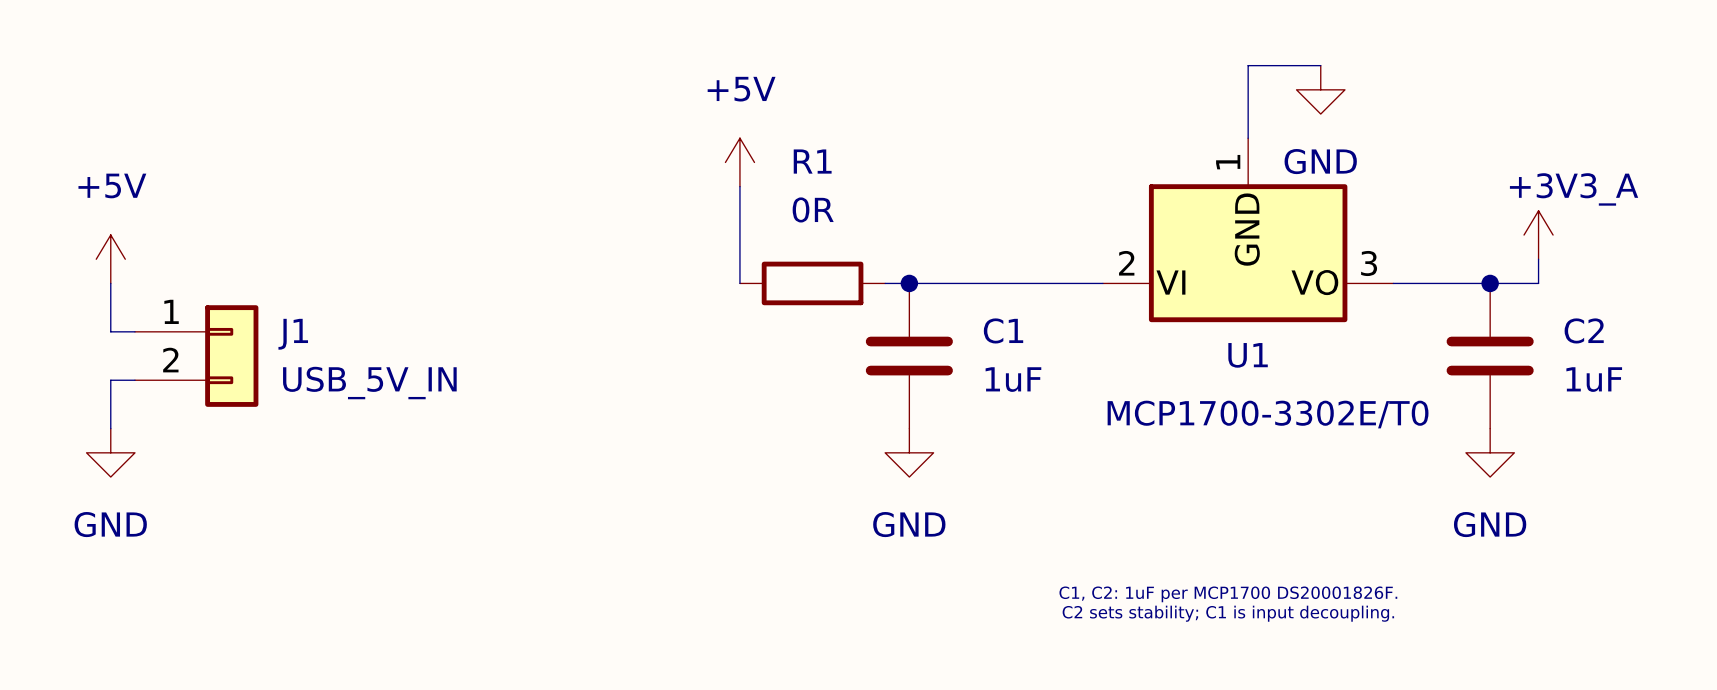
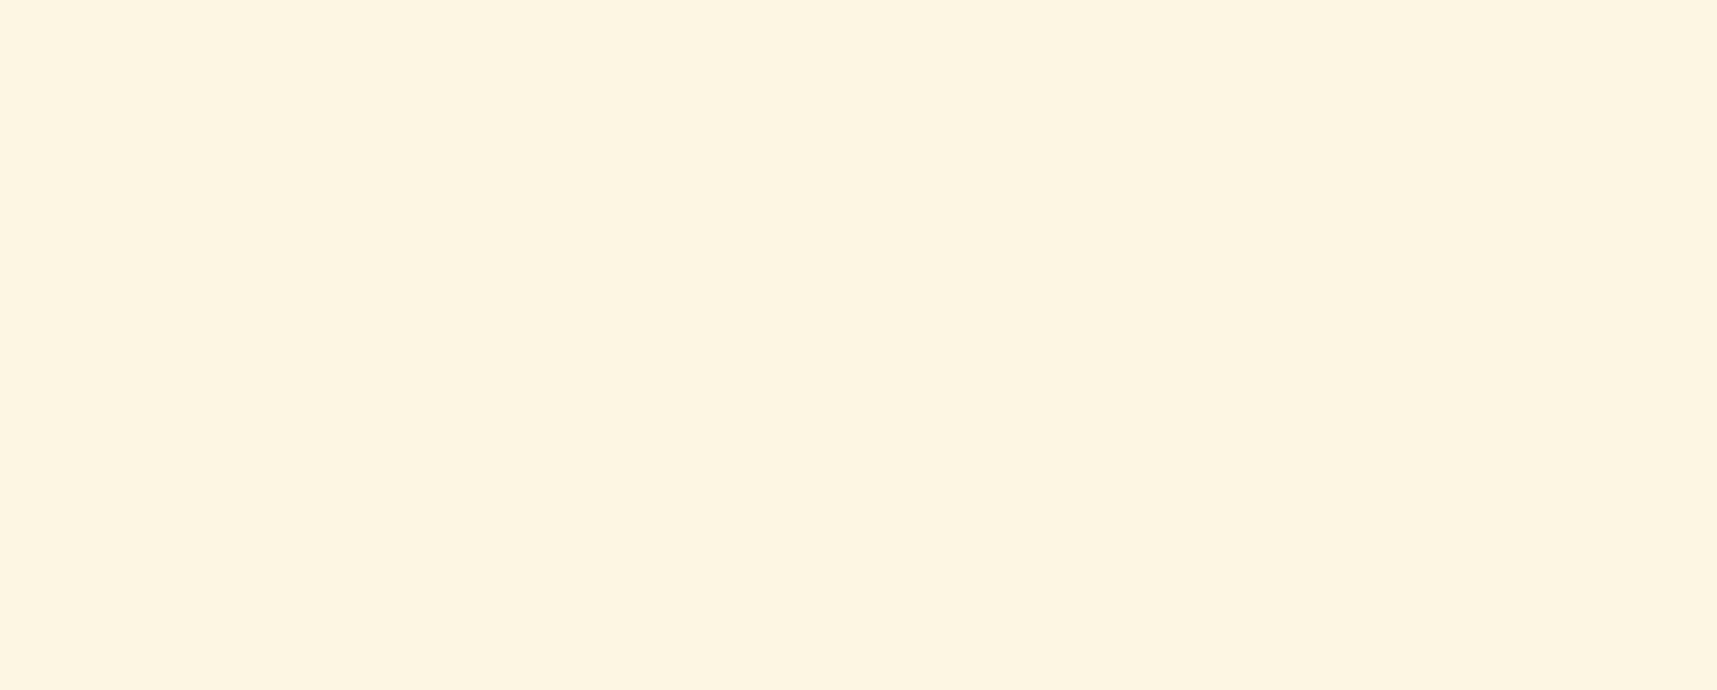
wire: (1320, 65) (1248, 65) (1248, 138) -> none
power symbol: GND (1320, 89) -> none
power symbol: +5V (739, 162) -> none
wire: (739, 186) (739, 283) -> none
U1: MCP1700-3302E/T0 (1248, 230) -> none
power symbol: +3V3_A (1538, 235) -> none
power symbol: +5V (110, 259) -> none
wire: (1538, 259) (1538, 283) (1393, 283) -> none
wire: (110, 283) (110, 331) (134, 331) -> none
R1: 0R (812, 283) -> none
wire: (885, 283) (1102, 283) -> none
junction: (909, 283) -> none
junction: (1490, 283) -> none
J1: USB_5V_IN (196, 356) -> none
C1: 1uF (909, 356) -> none
C2: 1uF (1490, 356) -> none
wire: (134, 380) (110, 380) (110, 428) -> none
power symbol: GND (110, 452) -> none
power symbol: GND (909, 452) -> none
power symbol: GND (1490, 452) -> none
text: C1, C2: 1uF per MCP1700 DS20001826F. (1228, 594) -> none
text: C2 sets stability; C1 is input decoupling. (1228, 613) -> none

